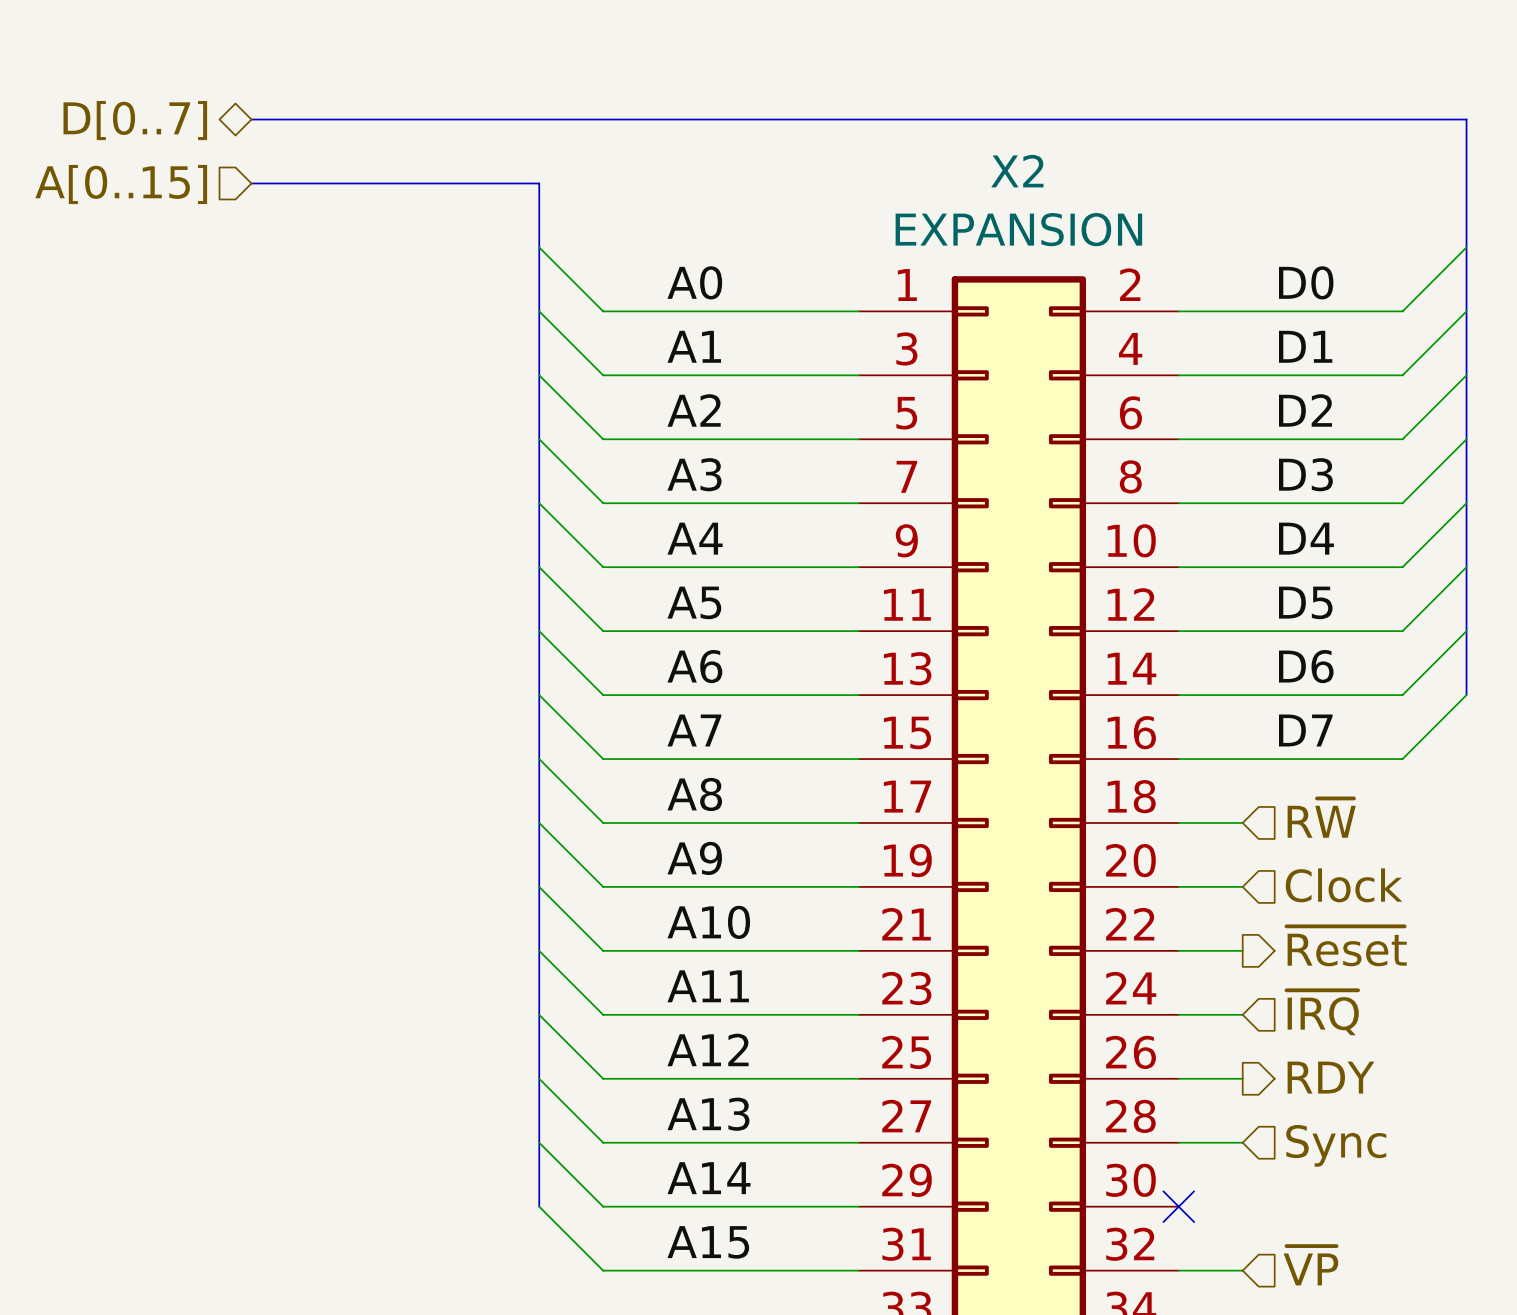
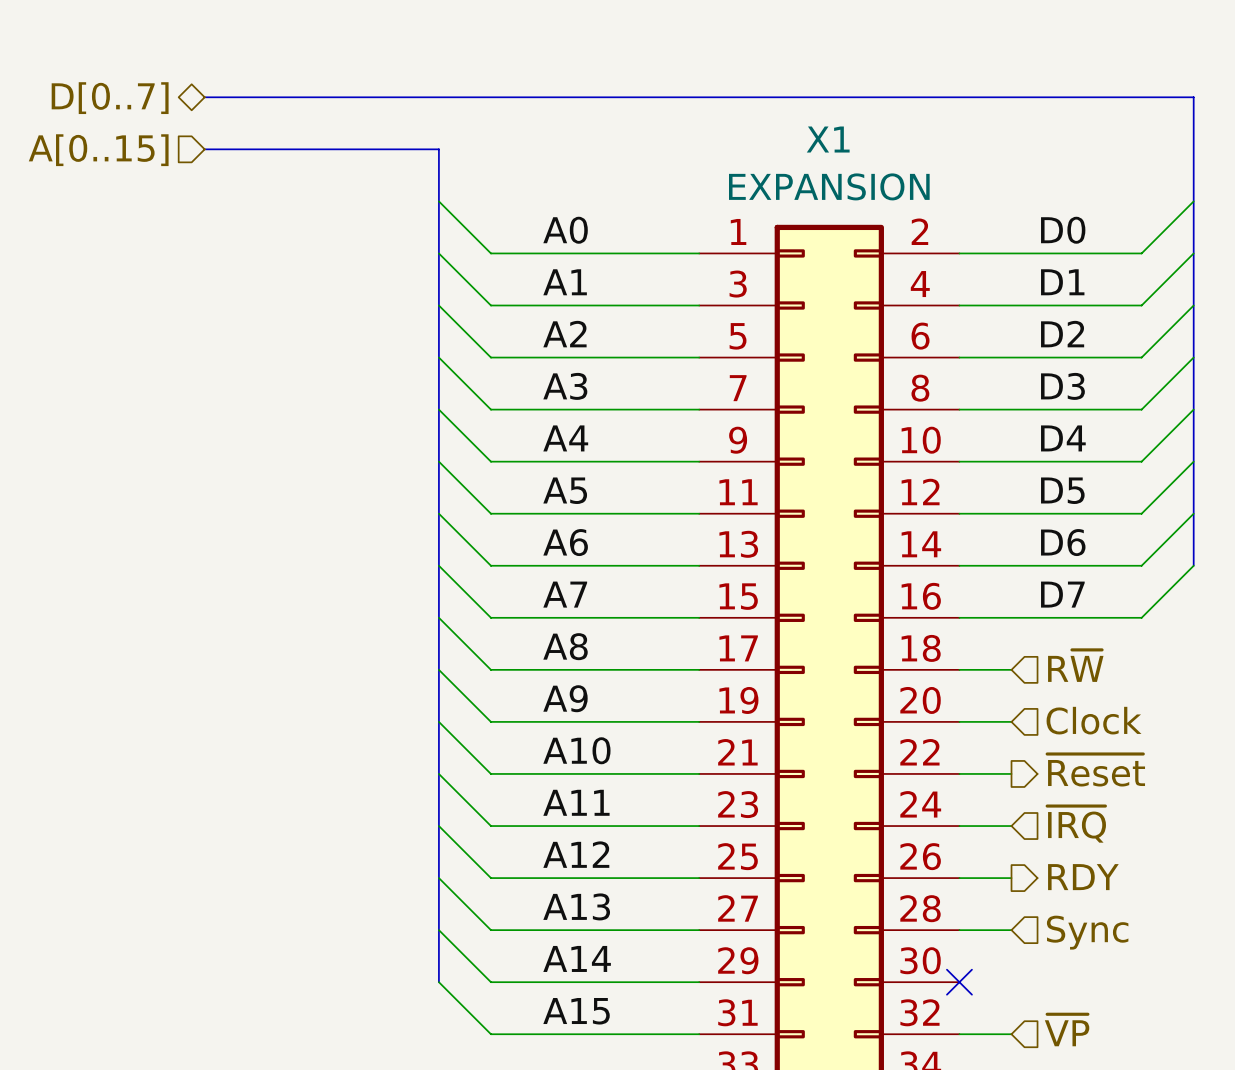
X2 name: X2 (1017, 171) -> X1 (828, 139)

